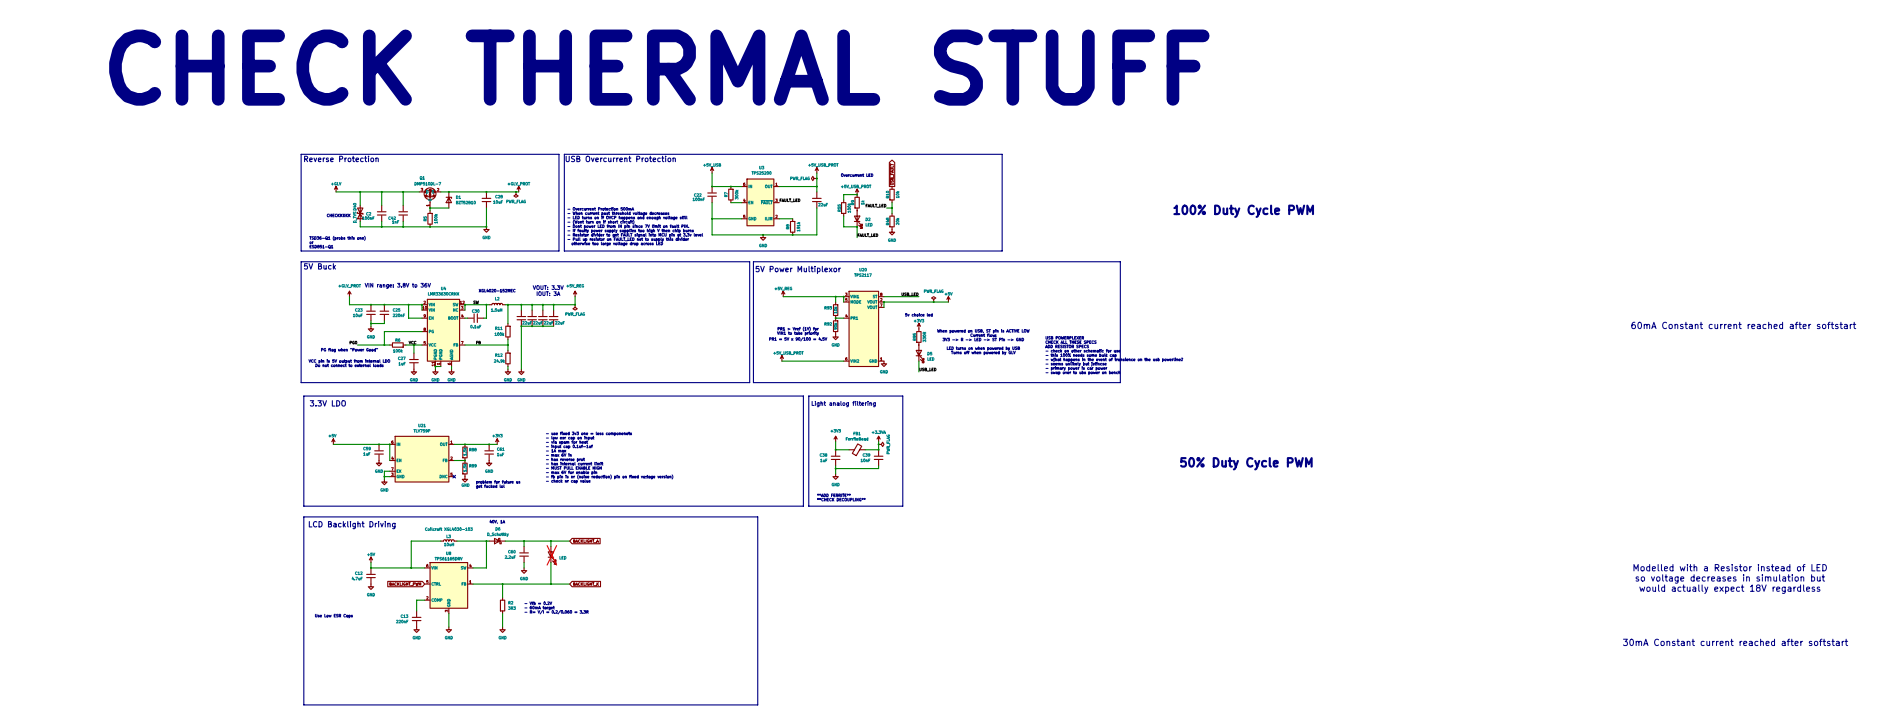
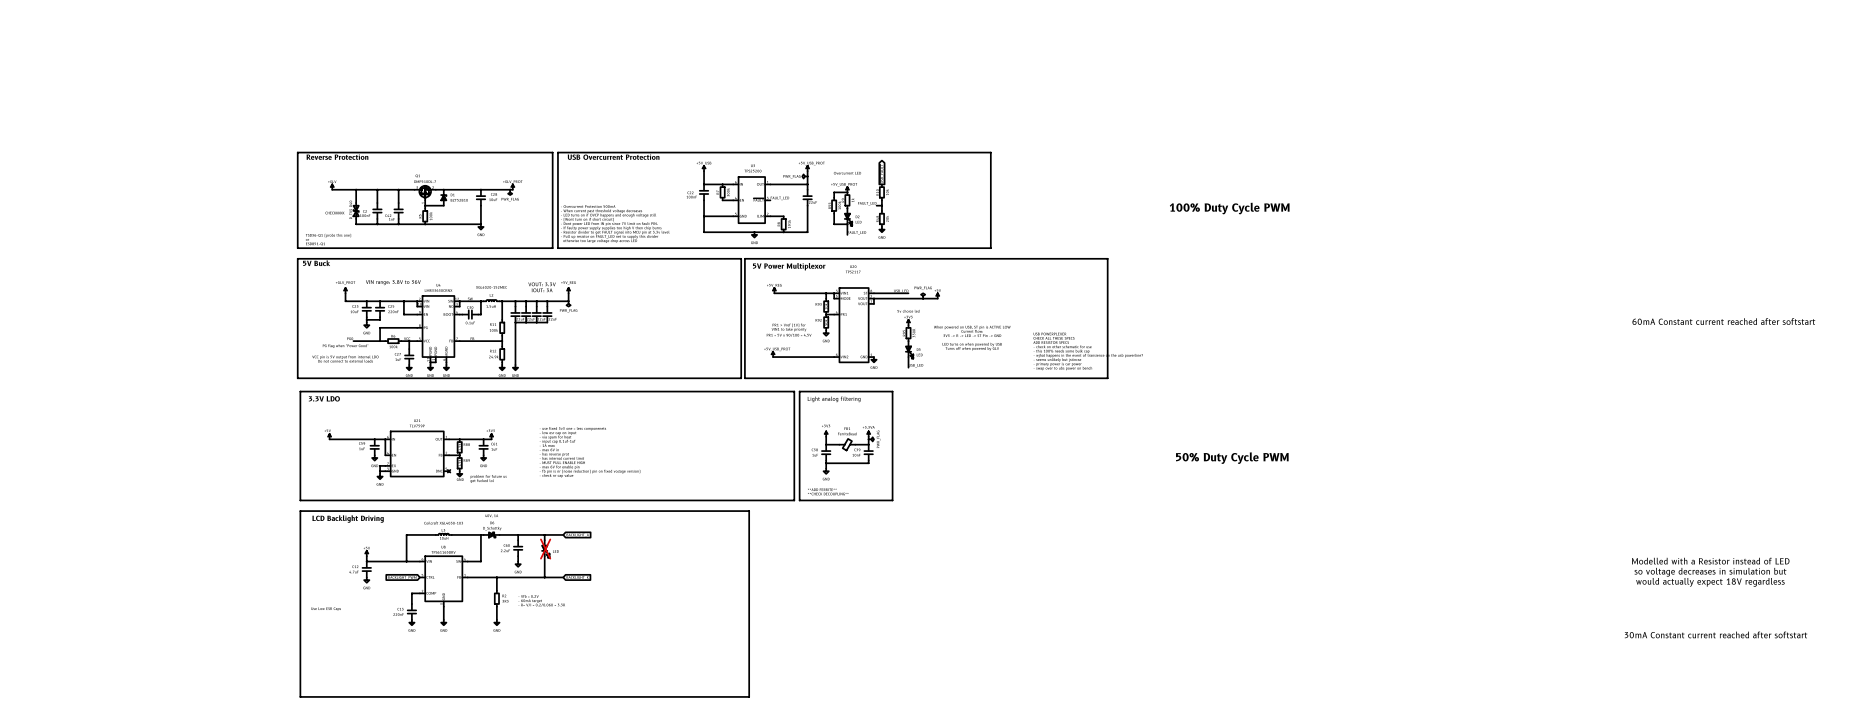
text: CHECK THERMAL STUFF (659, 67) -> none

